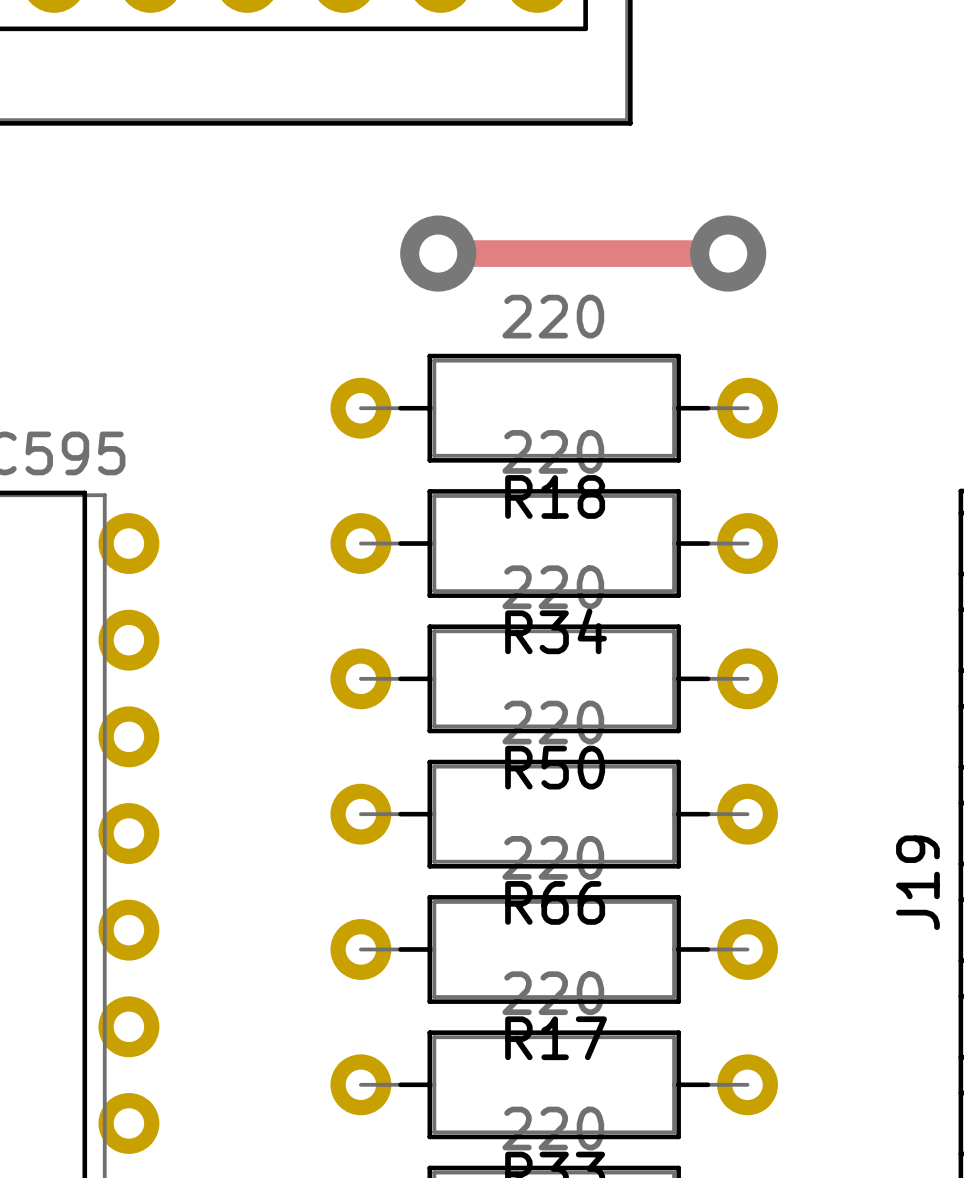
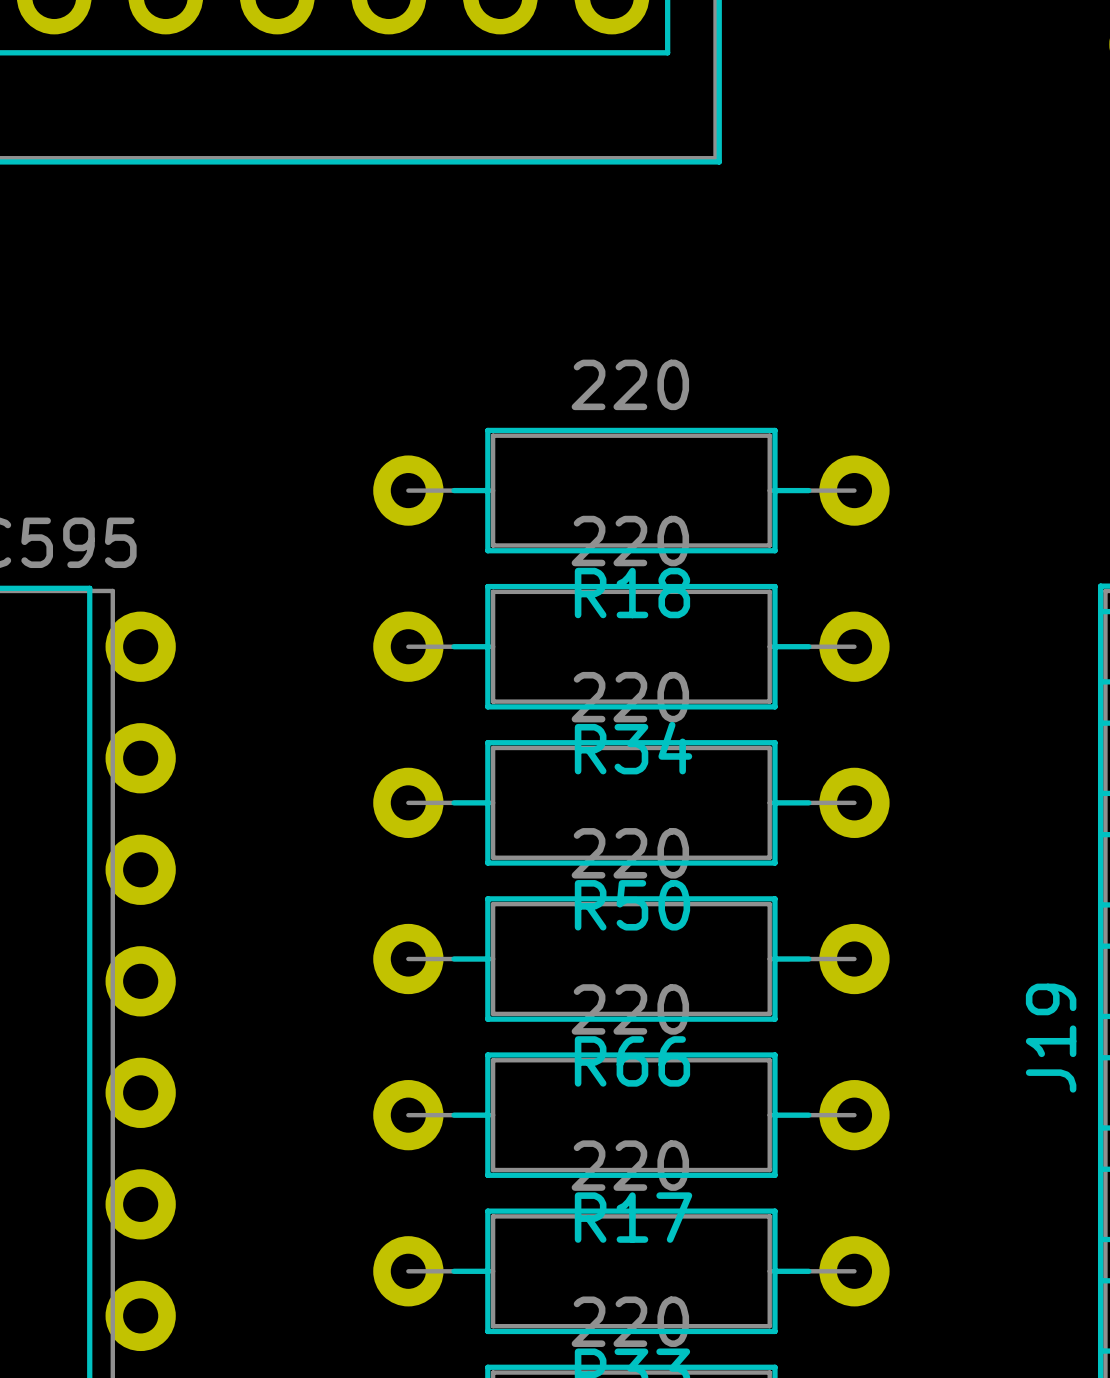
track: (438, 253) (728, 253) -> none
via: (438, 253) -> none
via: (728, 253) -> none

